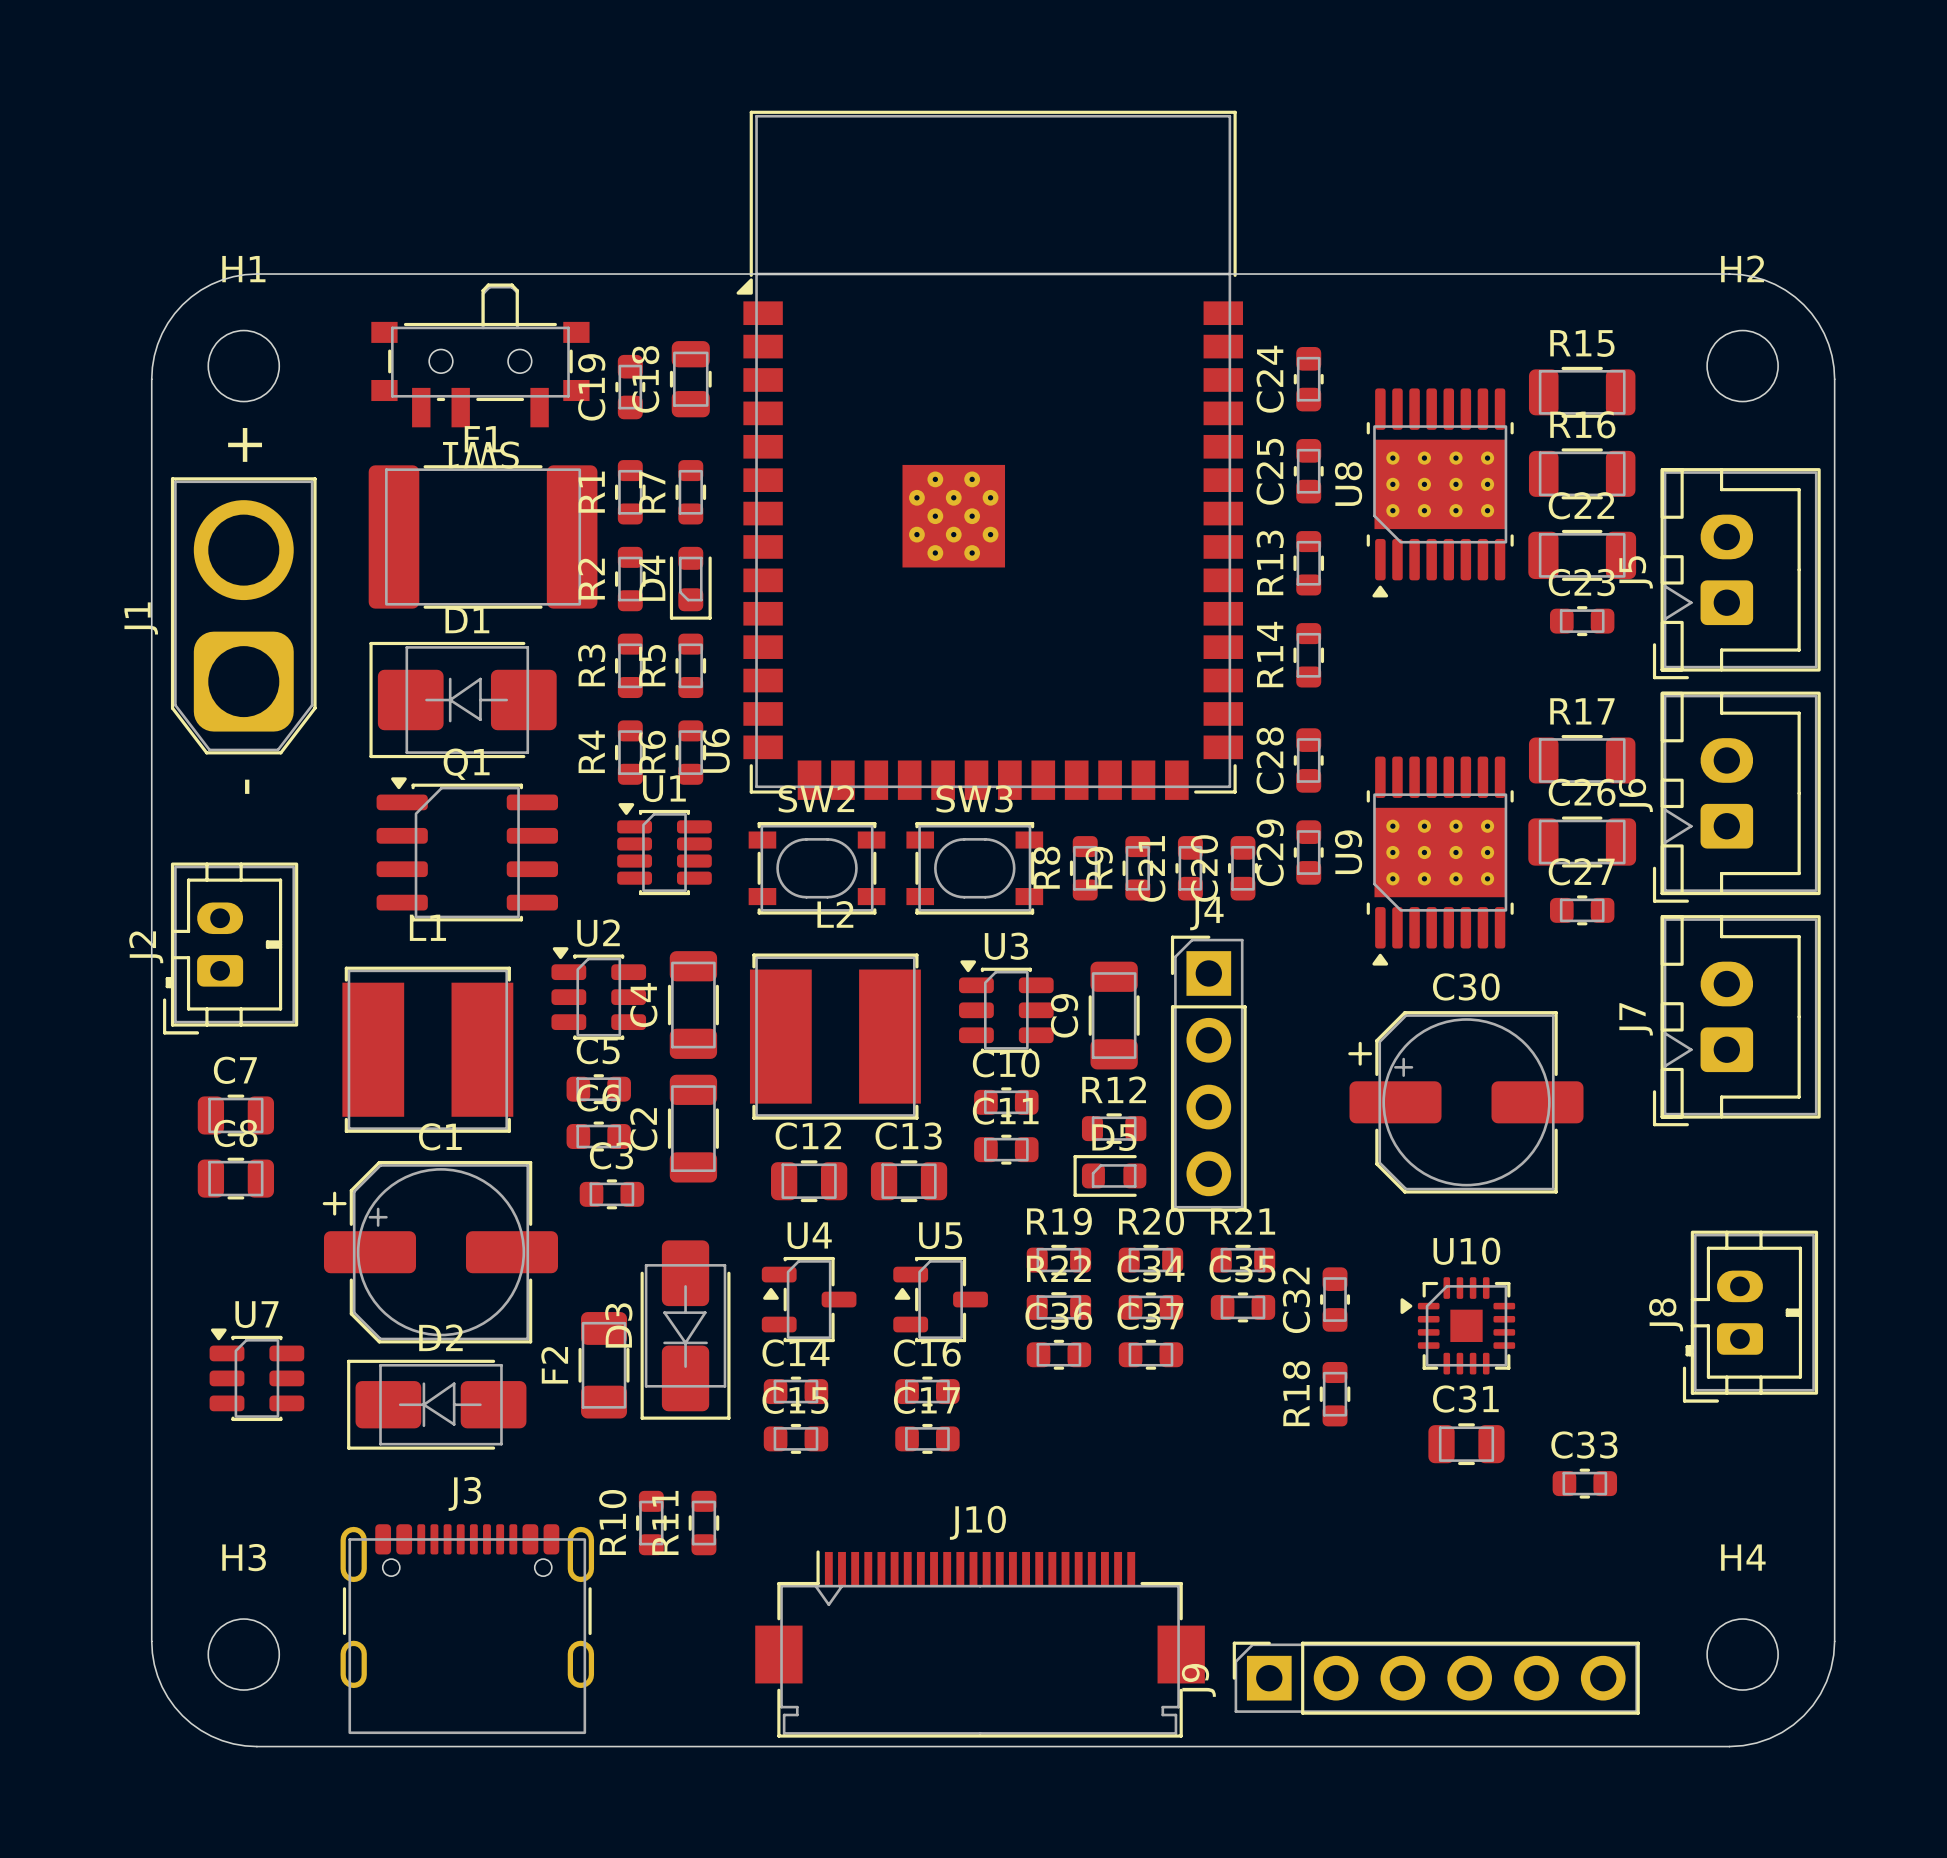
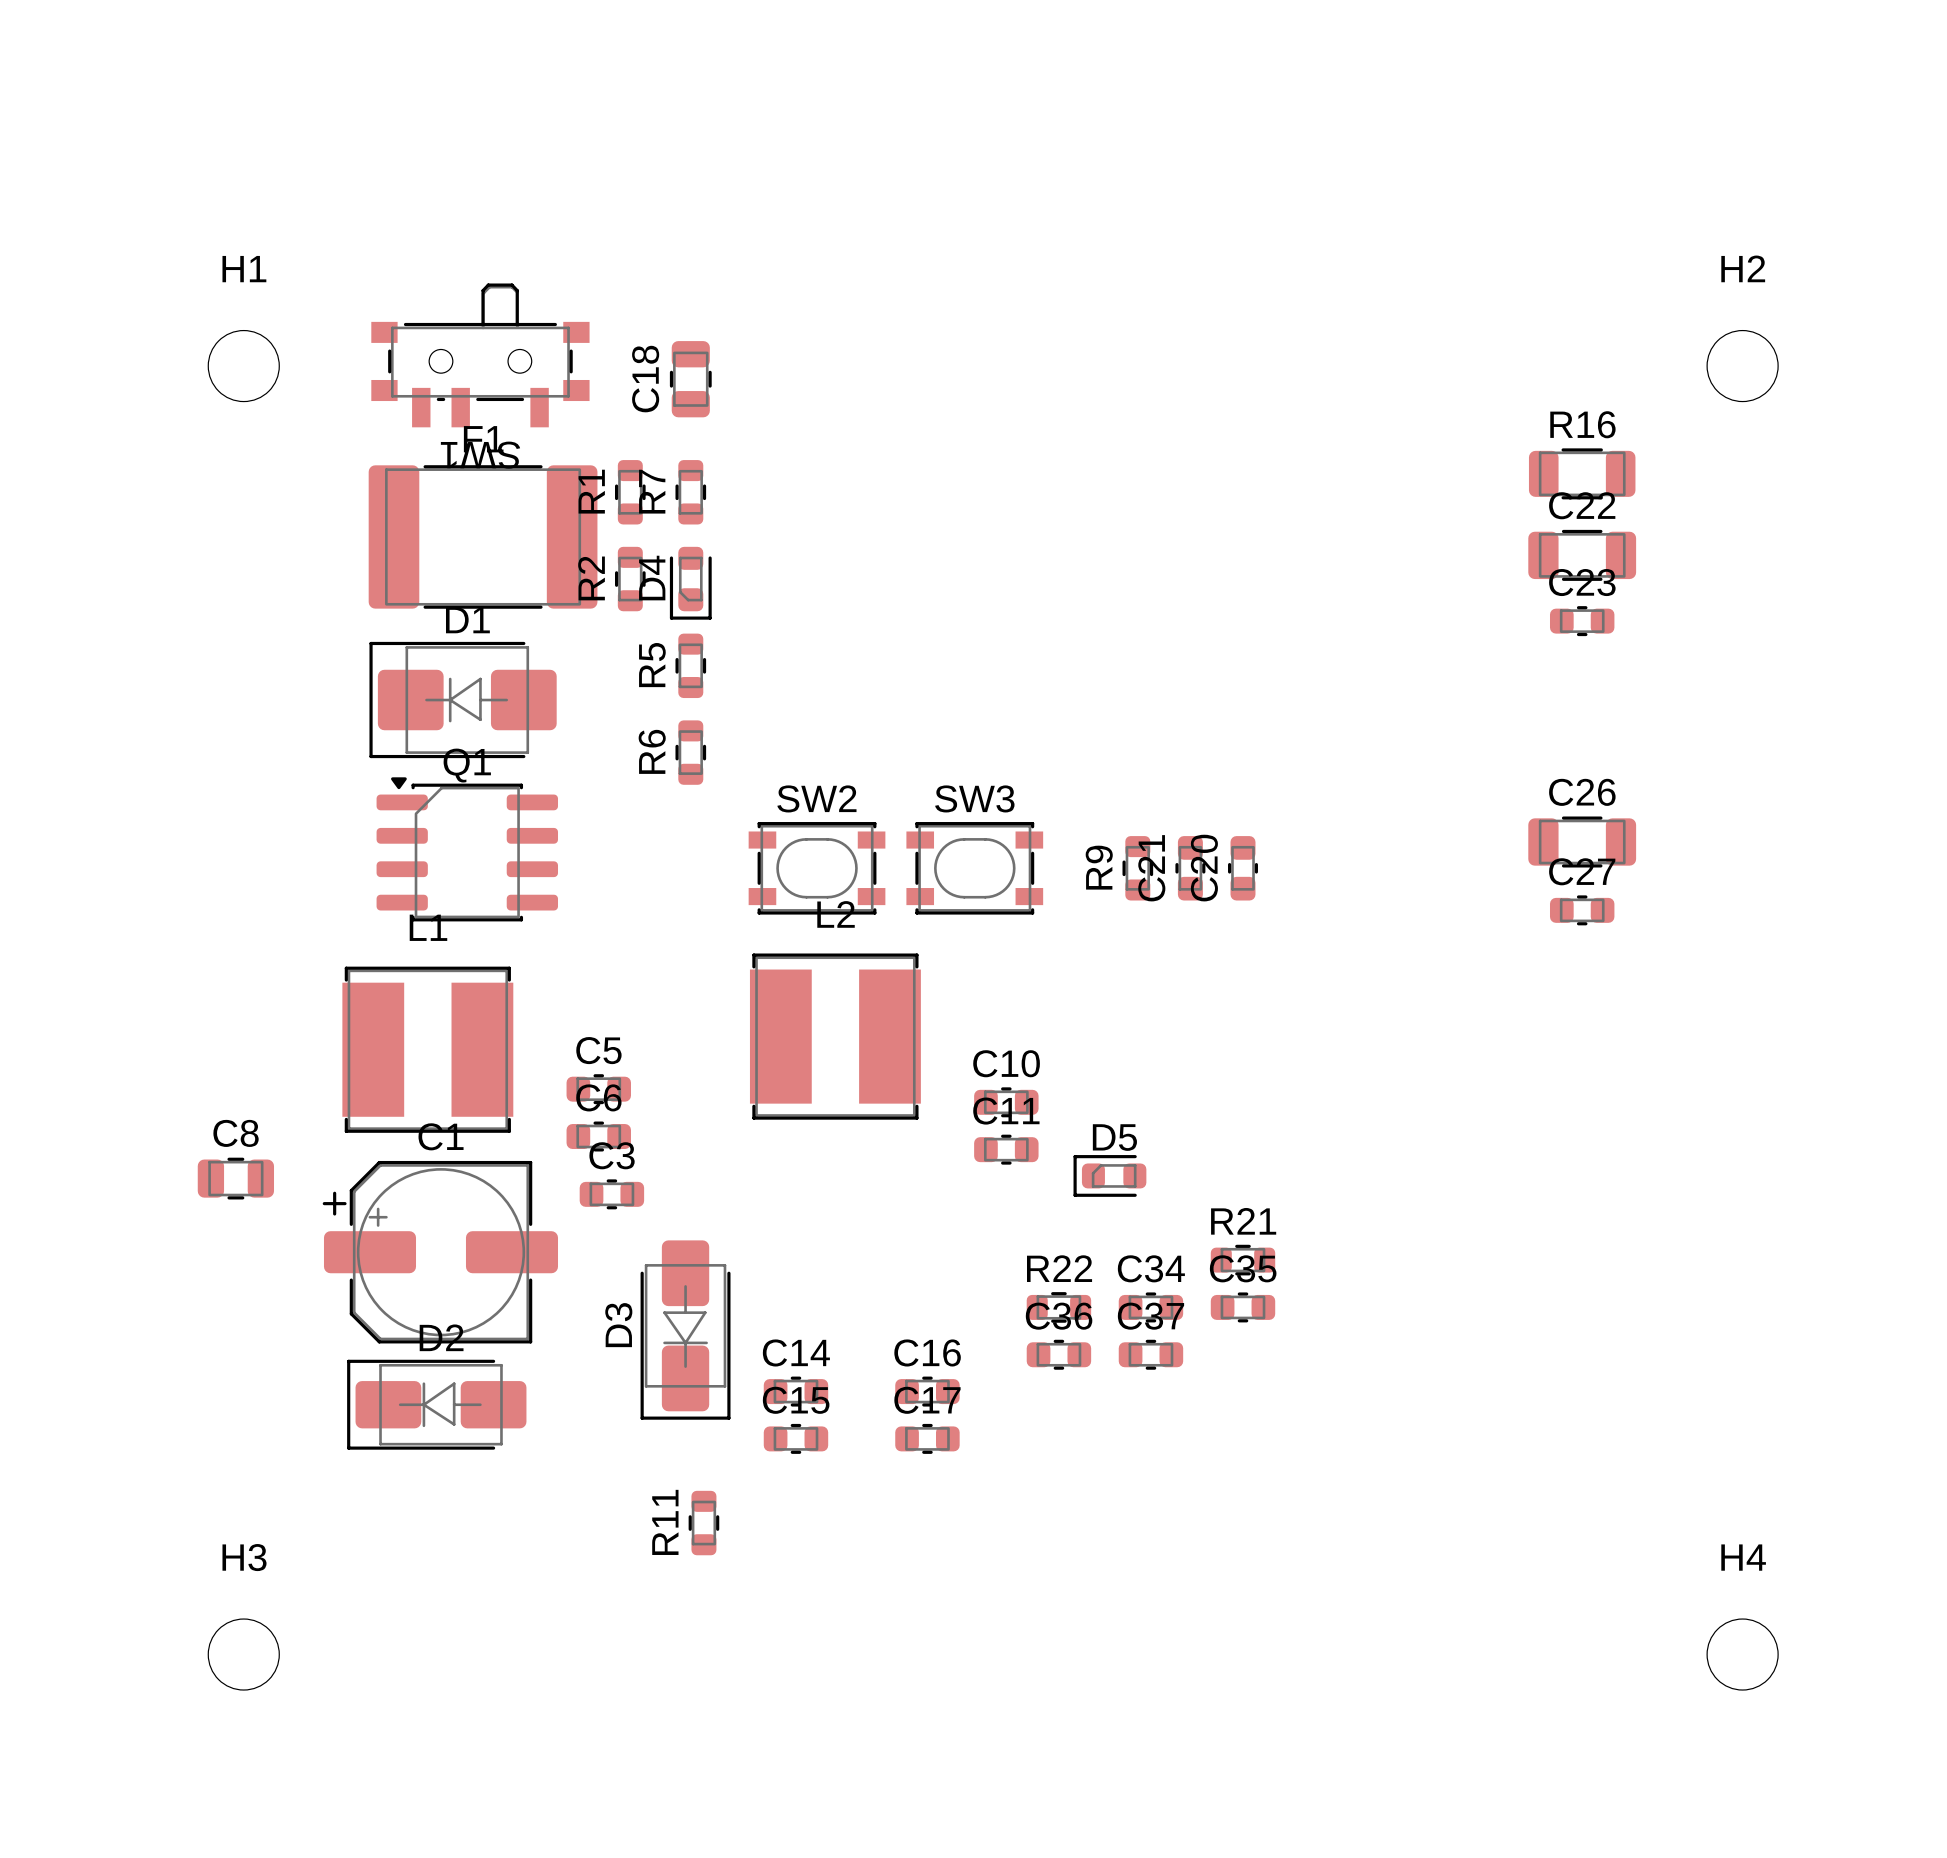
board edge: (256, 274) (1729, 274) (1764, 279) (1785, 290) (1803, 304) (1824, 333) (1832, 355) (1834, 379) (1834, 1641) (1831, 1668) (1826, 1681) (1812, 1705) (1803, 1715) (1793, 1724) (1769, 1738) (1743, 1745) (1729, 1746) (256, 1746) (233, 1743) (211, 1736) (182, 1715) (167, 1697) (157, 1676) (151, 1641) (151, 379) (154, 355) (162, 333) (182, 304) (211, 284) (233, 276) (256, 274) -> none
C24: (1308, 379) -> none
C19: (630, 387) -> none
R15: (1582, 392) -> none
U6: (989, 455) -> none
C25: (1308, 471) -> none
U8: (1440, 492) -> none
R13: (1308, 563) -> none
J5: (1736, 573) -> none
J1: (243, 615) -> none
R14: (1308, 655) -> none
R3: (630, 665) -> none
R4: (630, 752) -> none
C28: (1308, 760) -> none
R17: (1582, 760) -> none
J6: (1736, 797) -> none
U1: (664, 849) -> none
C29: (1308, 852) -> none
U9: (1440, 861) -> none
R8: (1085, 868) -> none
J2: (230, 948) -> none
U2: (598, 993) -> none
C4: (693, 1005) -> none
U3: (1006, 1006) -> none
C9: (1114, 1015) -> none
J7: (1736, 1020) -> none
J4: (1208, 1073) -> none
C30: (1465, 1102) -> none
C7: (235, 1115) -> none
C2: (693, 1128) -> none
R12: (1114, 1128) -> none
C12: (809, 1181) -> none
C13: (909, 1181) -> none
R19: (1058, 1260) -> none
R20: (1150, 1260) -> none
U4: (809, 1299) -> none
U5: (940, 1299) -> none
C32: (1335, 1299) -> none
J8: (1750, 1316) -> none
U10: (1457, 1325) -> none
F2: (604, 1365) -> none
U7: (256, 1374) -> none
R18: (1335, 1394) -> none
C31: (1466, 1444) -> none
C33: (1584, 1483) -> none
R10: (651, 1523) -> none
J3: (467, 1629) -> none
J10: (980, 1644) -> none
J9: (1436, 1678) -> none

